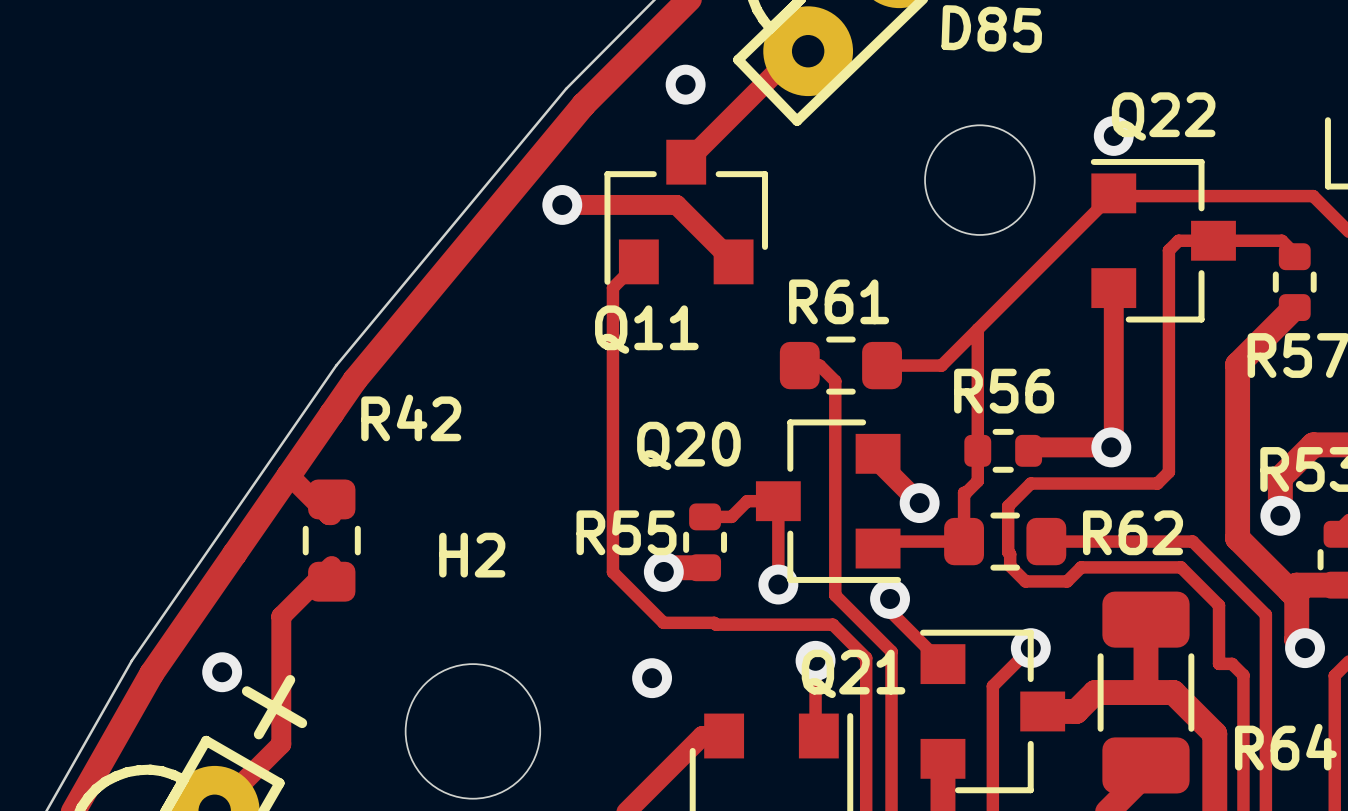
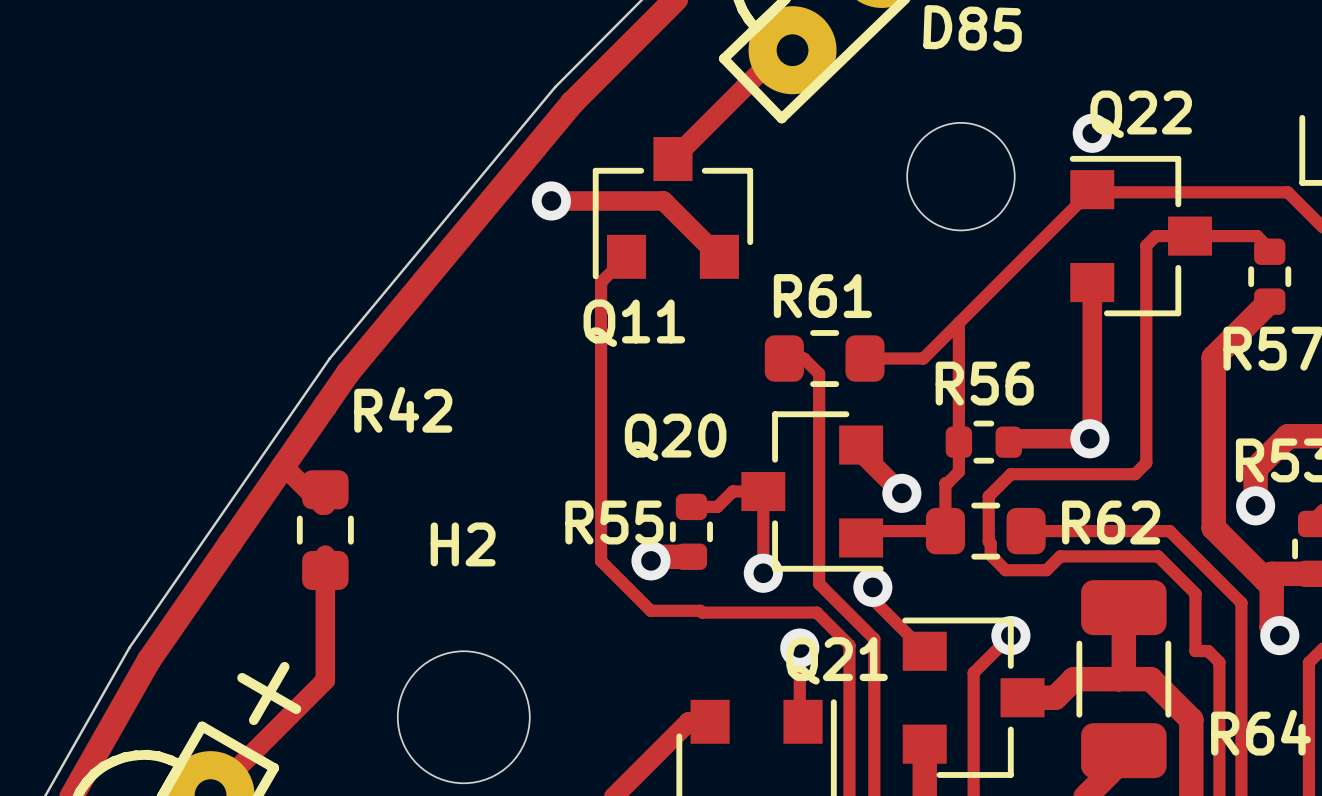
via: (685, 84) -> none
track: (331, 566) (281, 616) (281, 744) -> (325, 555) (325, 680) (275, 729)
via: (222, 672) -> none
via: (652, 678) -> none

